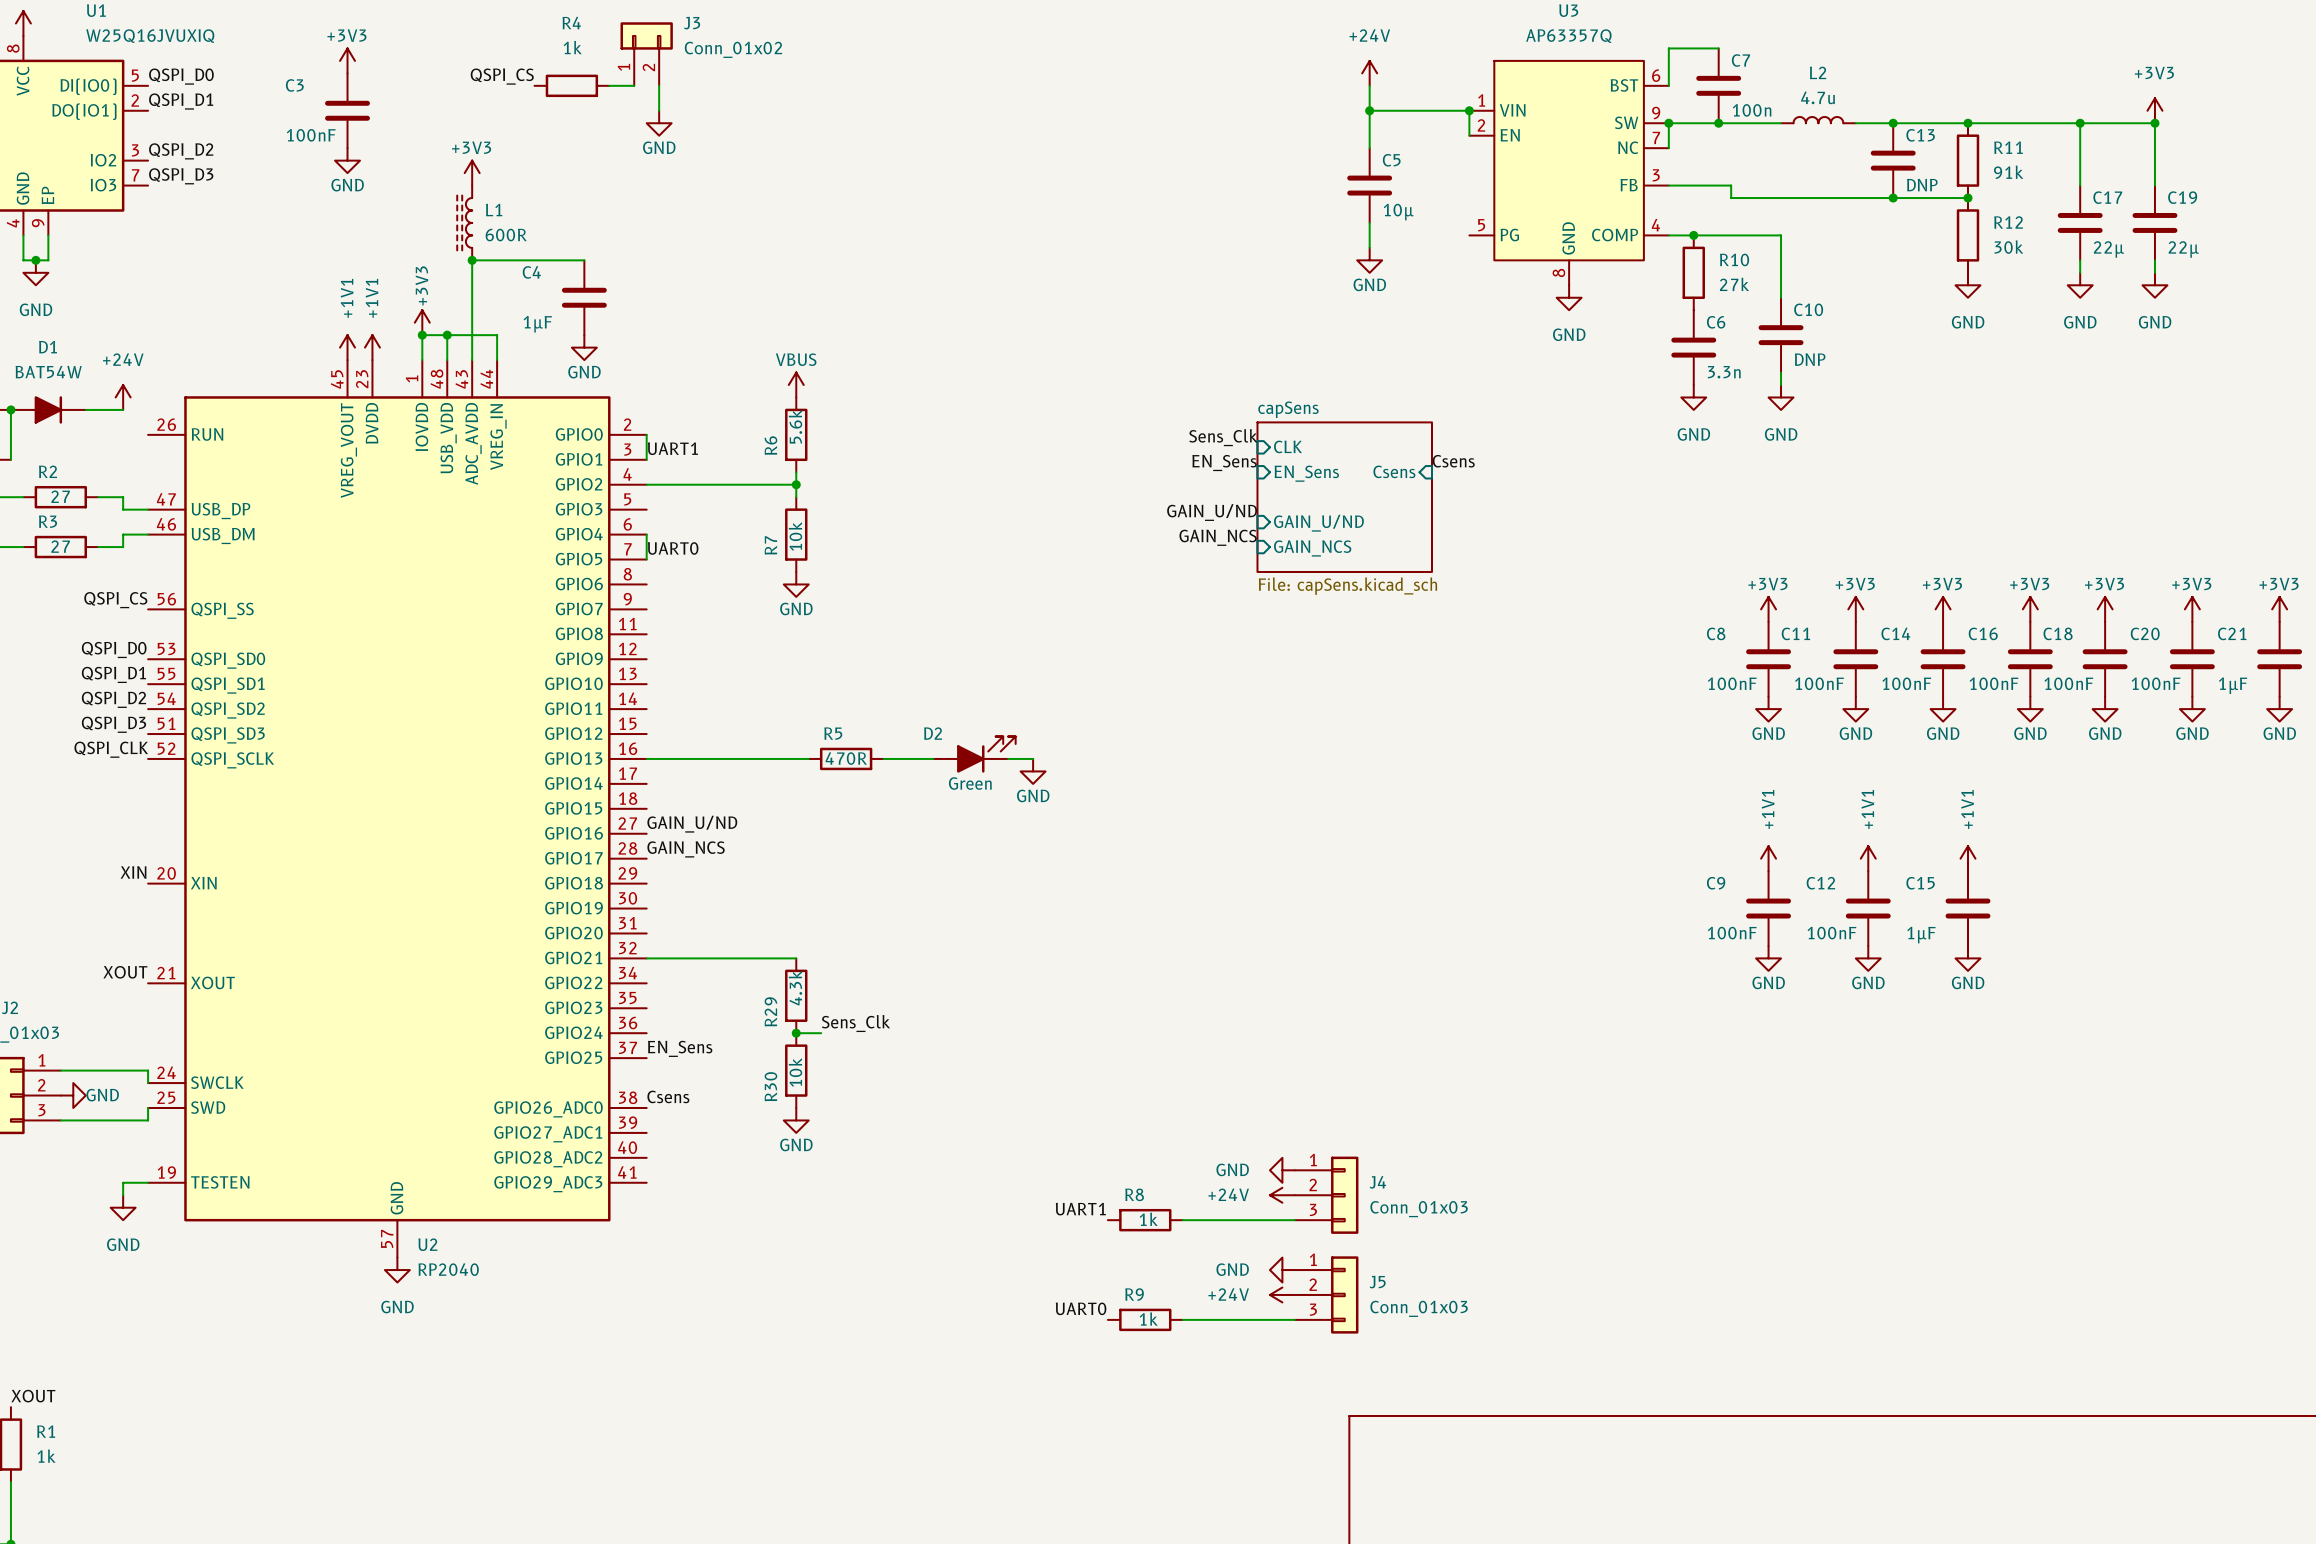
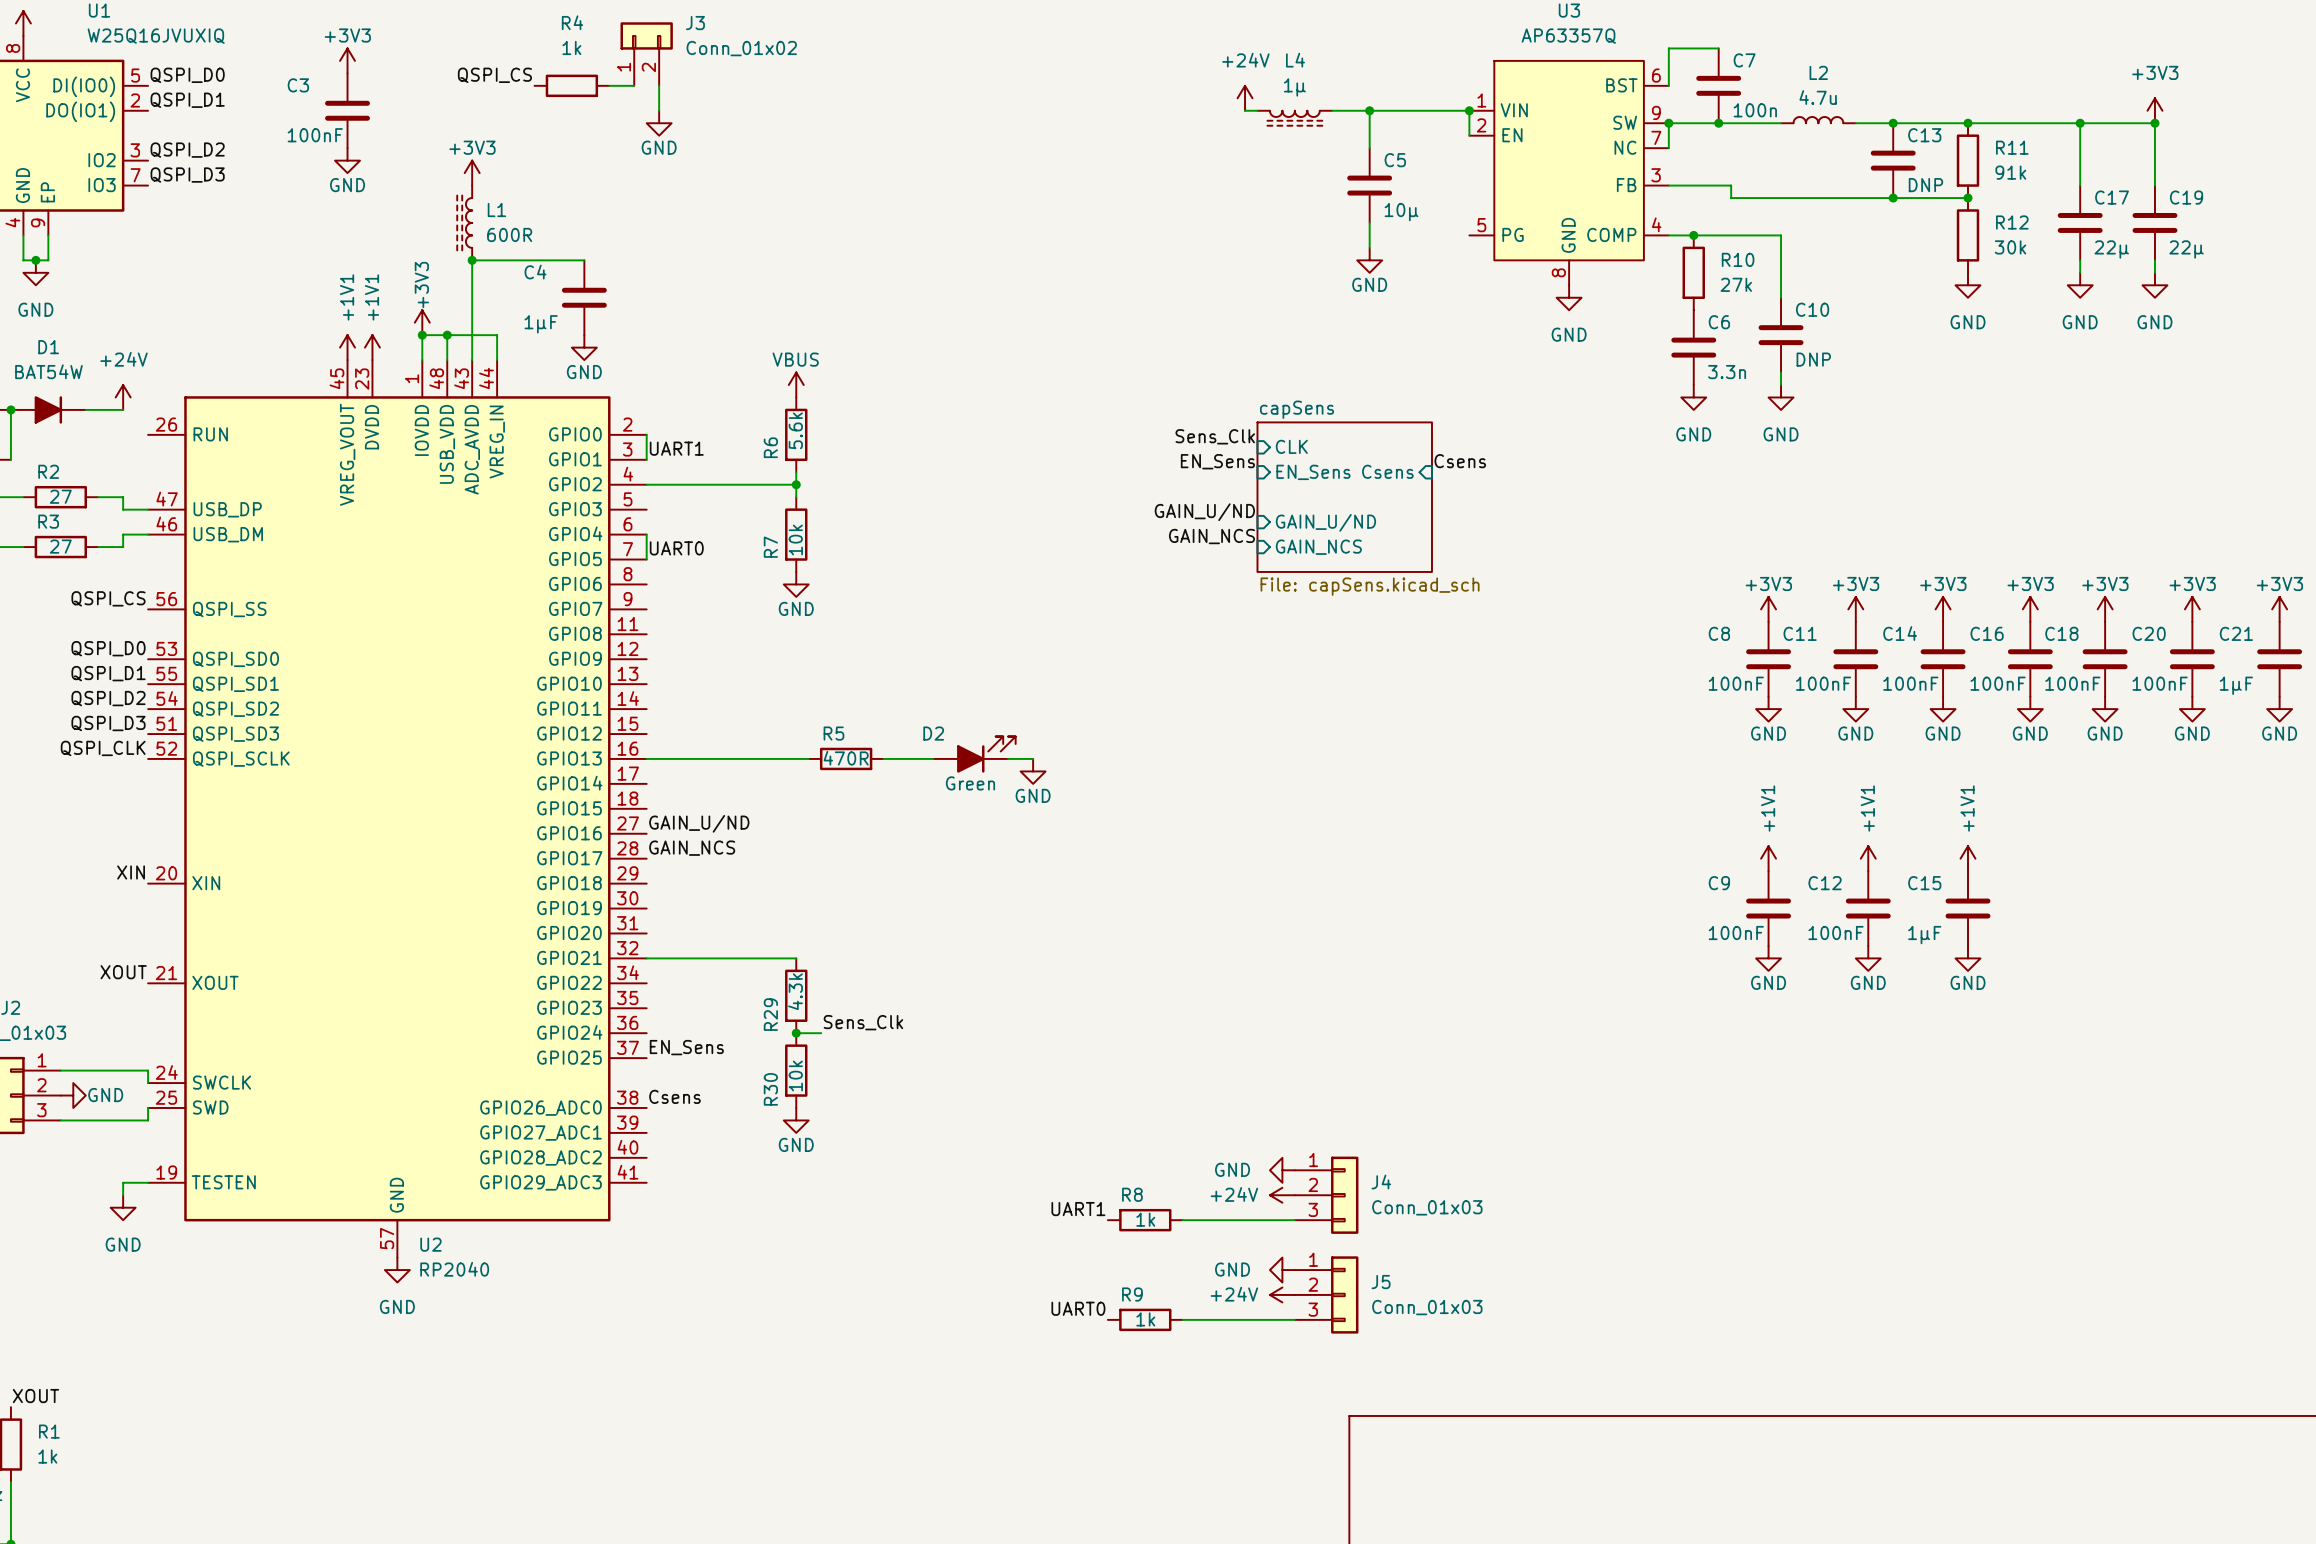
power symbol position: +24V (1369, 73) -> +24V (1245, 98)
wire: (1369, 85) (1369, 110) -> (1332, 110) (1369, 110)
wire: none -> (1245, 110) (1257, 110)
L4: none -> 1µ (1294, 118)

